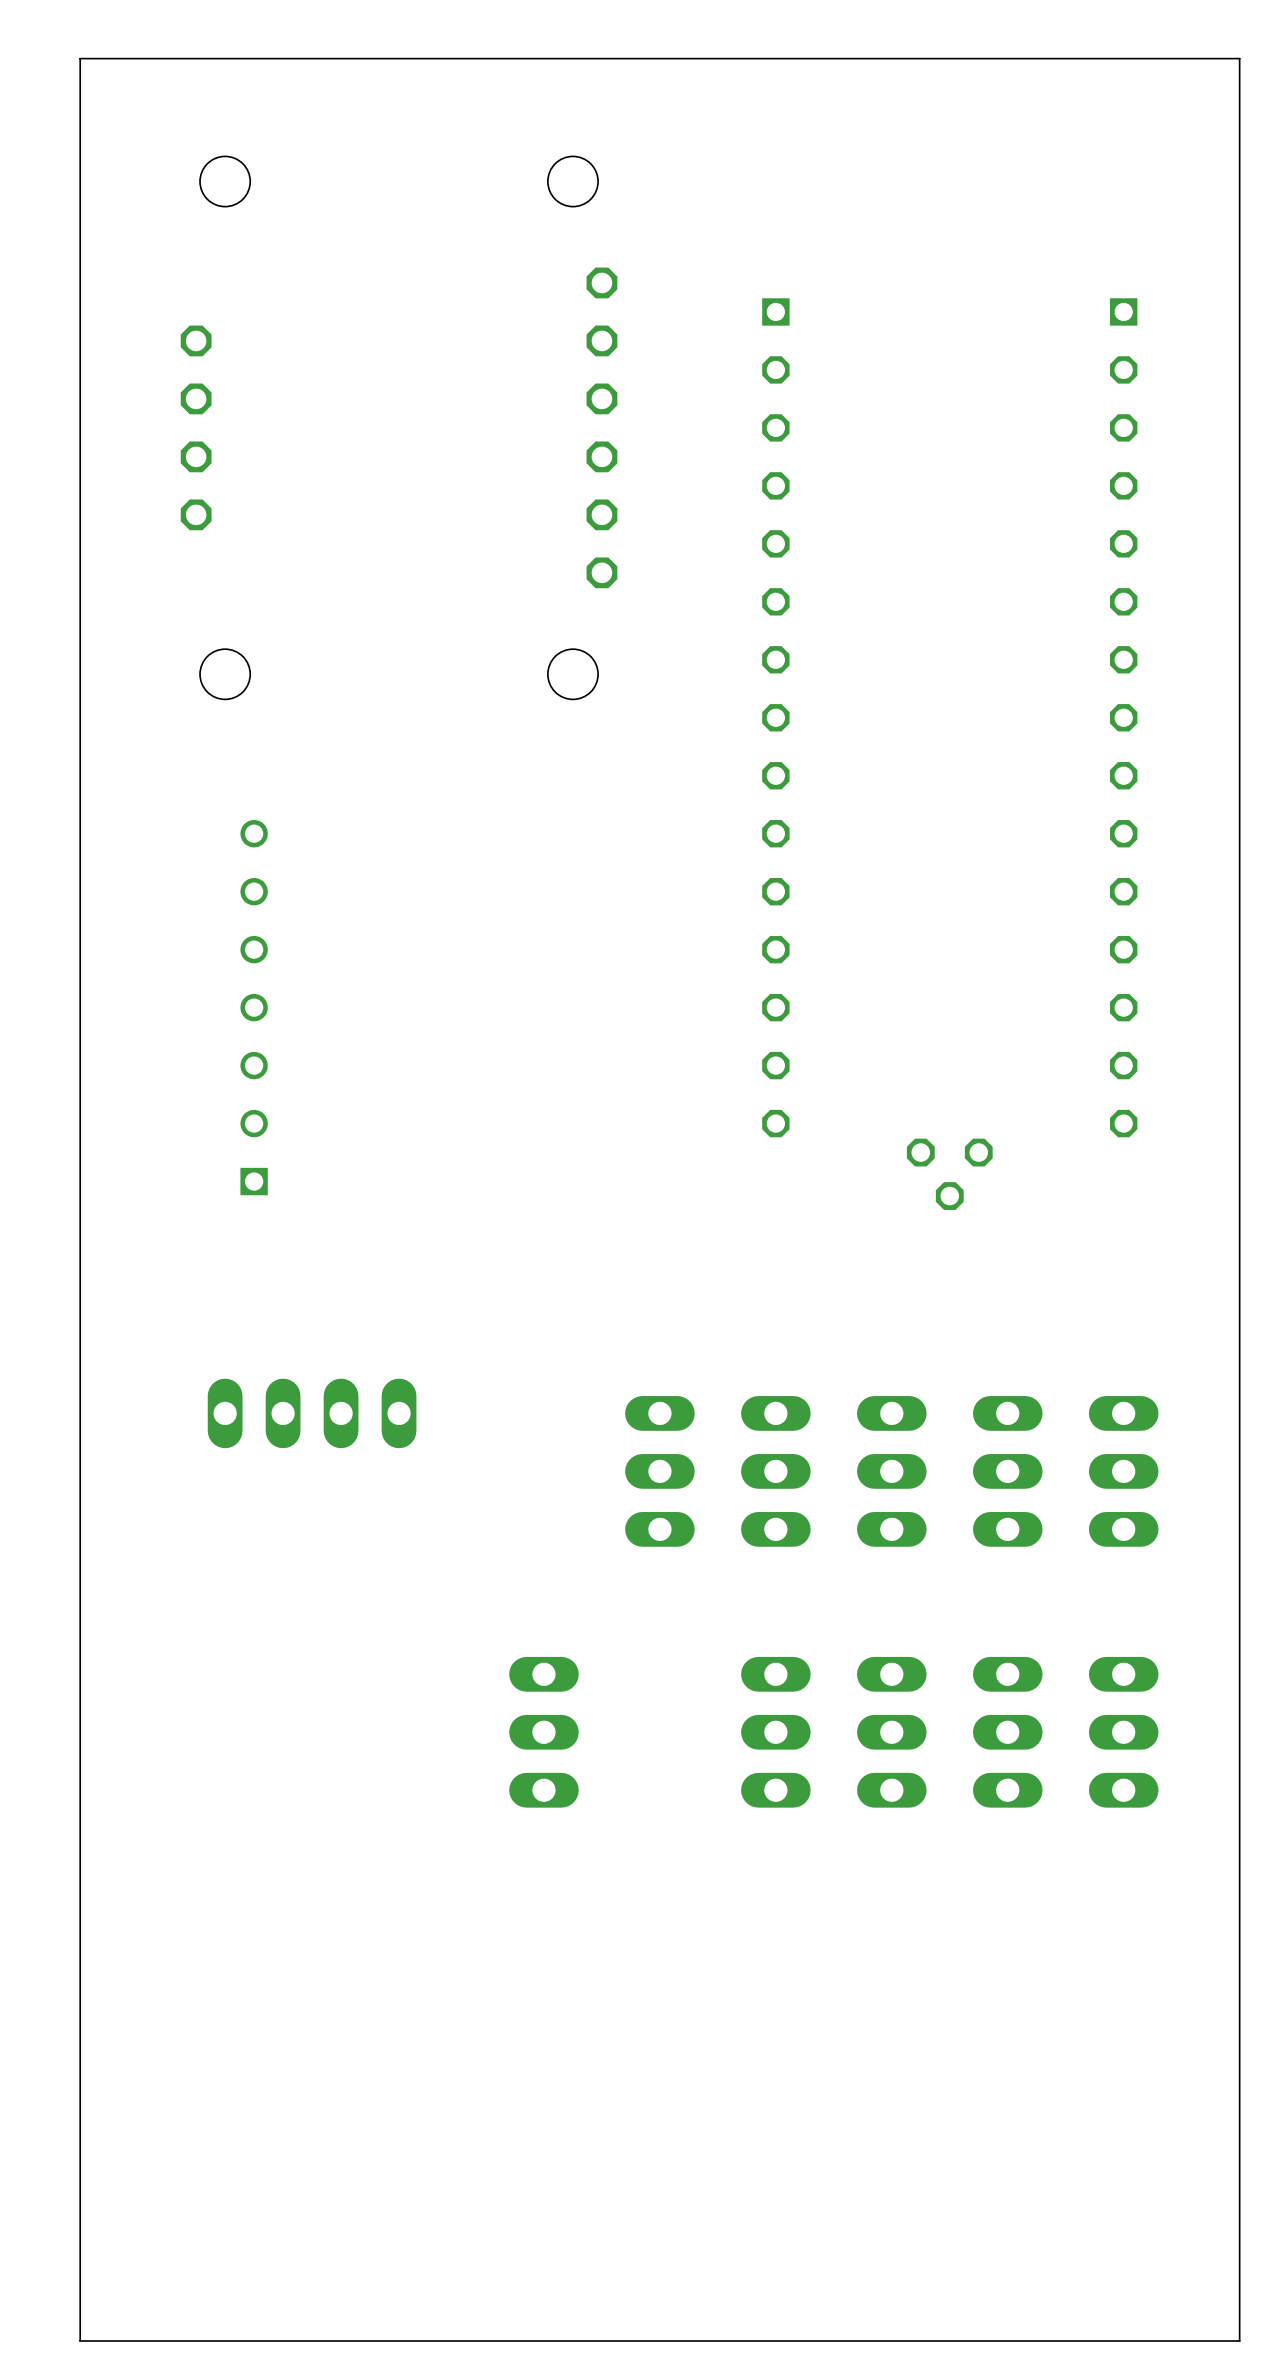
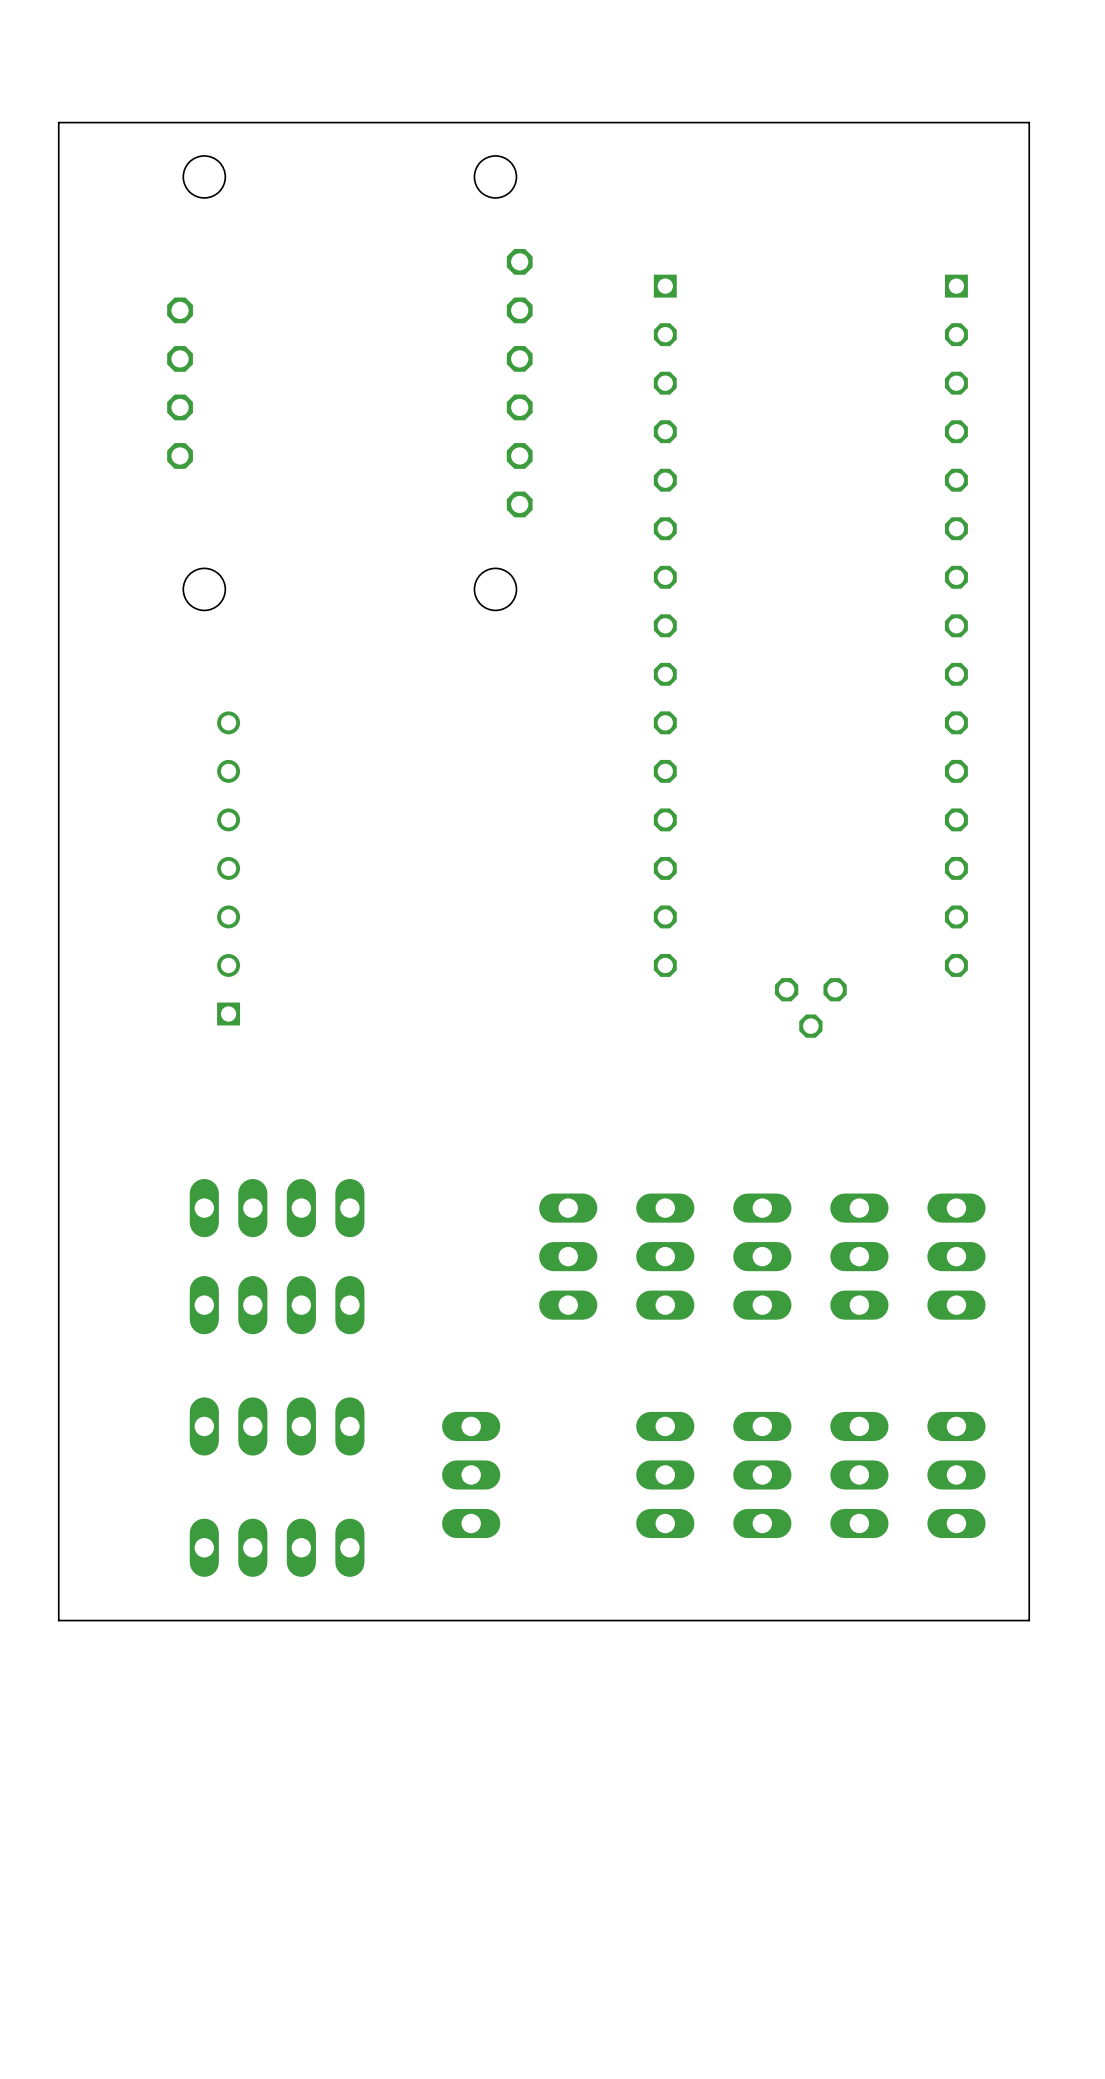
board edge: (1239, 58) (80, 58) (80, 2340) (1239, 2340) (1239, 58) -> (1029, 122) (1029, 1620) (58, 1620) (58, 122) (1029, 122)
part: none -> (277, 1305)
part: none -> (277, 1426)
part: none -> (277, 1547)

